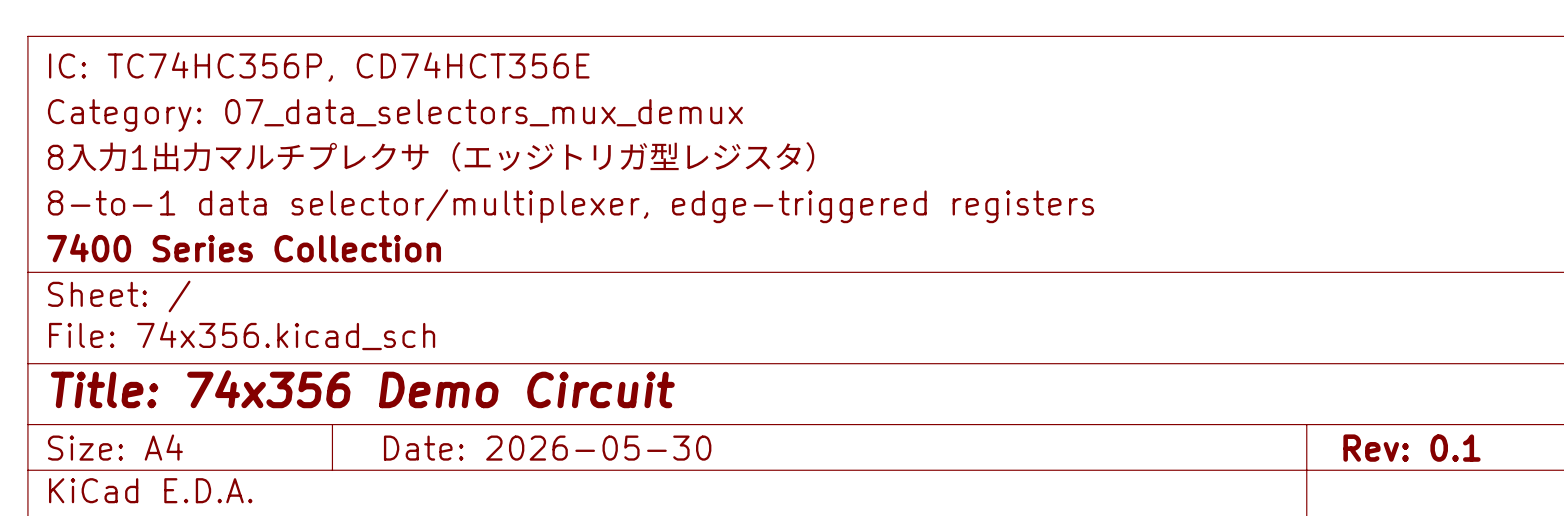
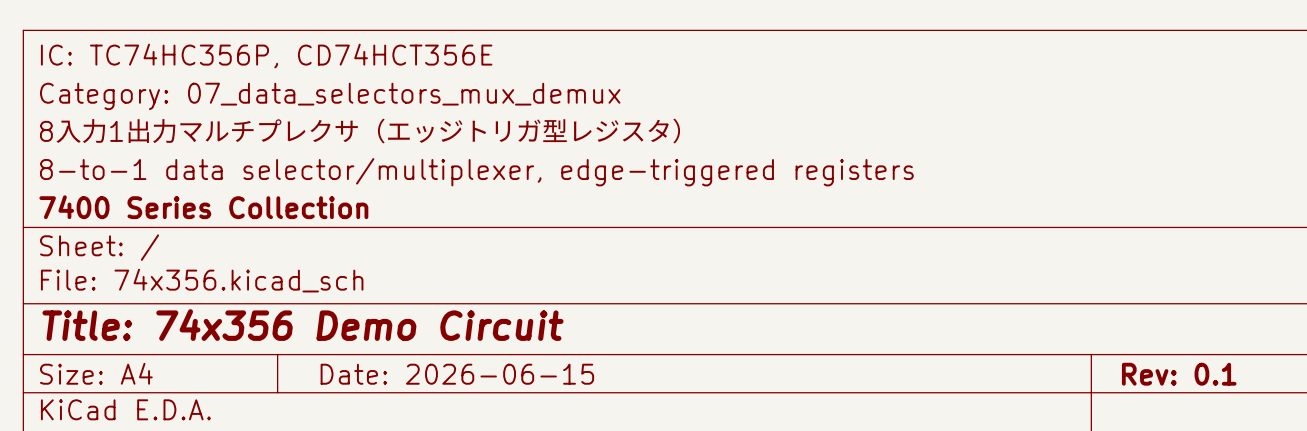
title block: Date: 2026-05-30 (547, 448) -> Date: 2026-06-15 (457, 374)

